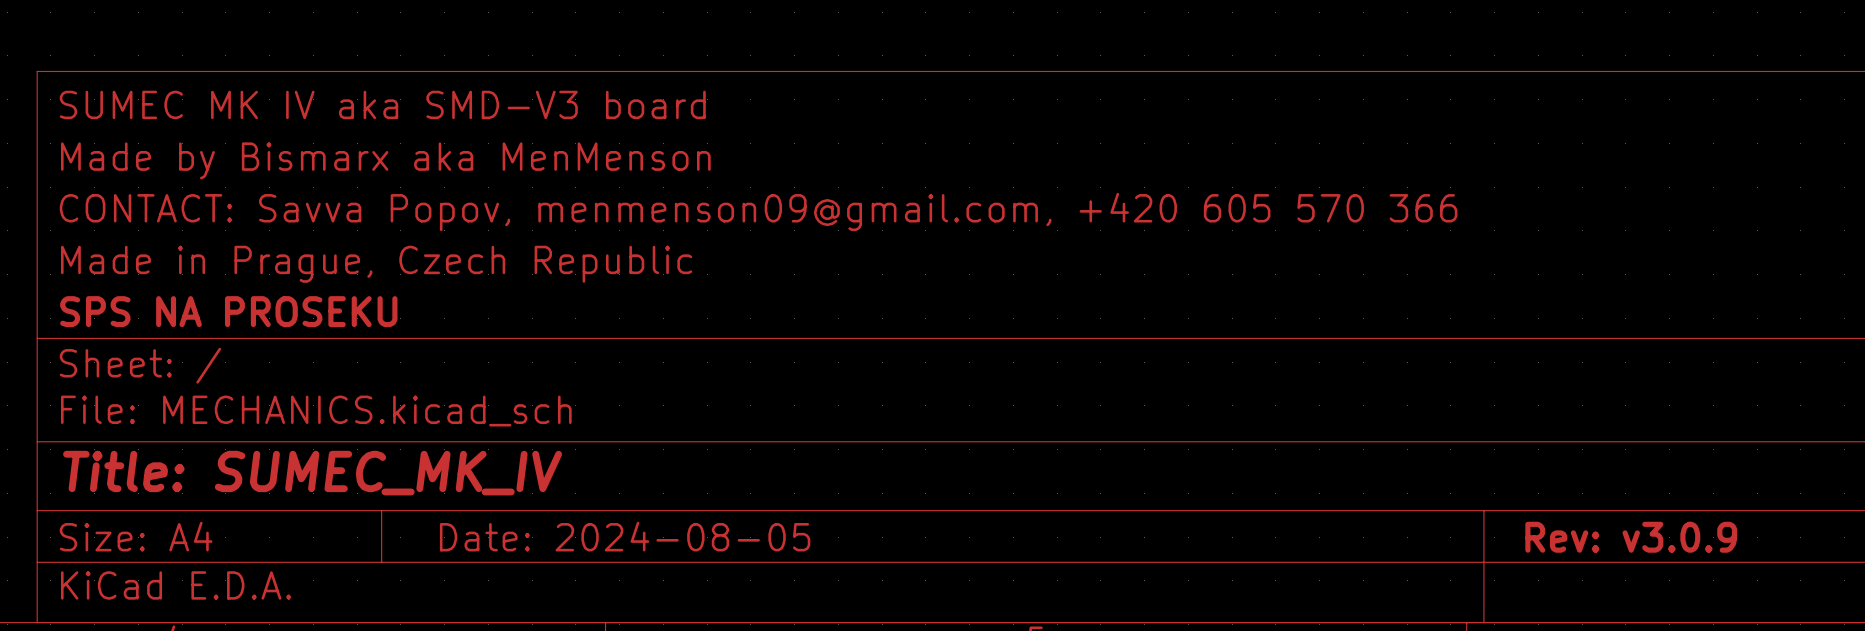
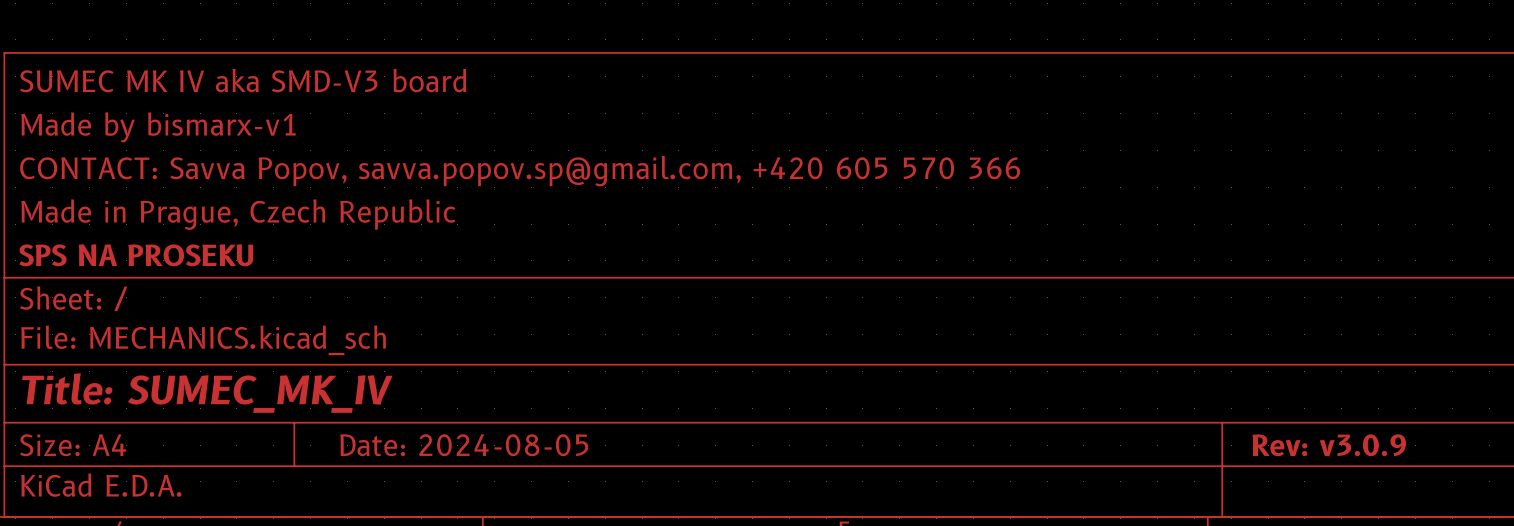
title block: Made by Bismarx aka MenMenson (385, 160) -> Made by bismarx-v1 (158, 127)
title block: CONTACT: Savva Popov, menmenson09@gmail.com, +420 605 570 366 (758, 211) -> CONTACT: Savva Popov, savva.popov.sp@gmail.com, +420 605 570 366 (520, 171)

